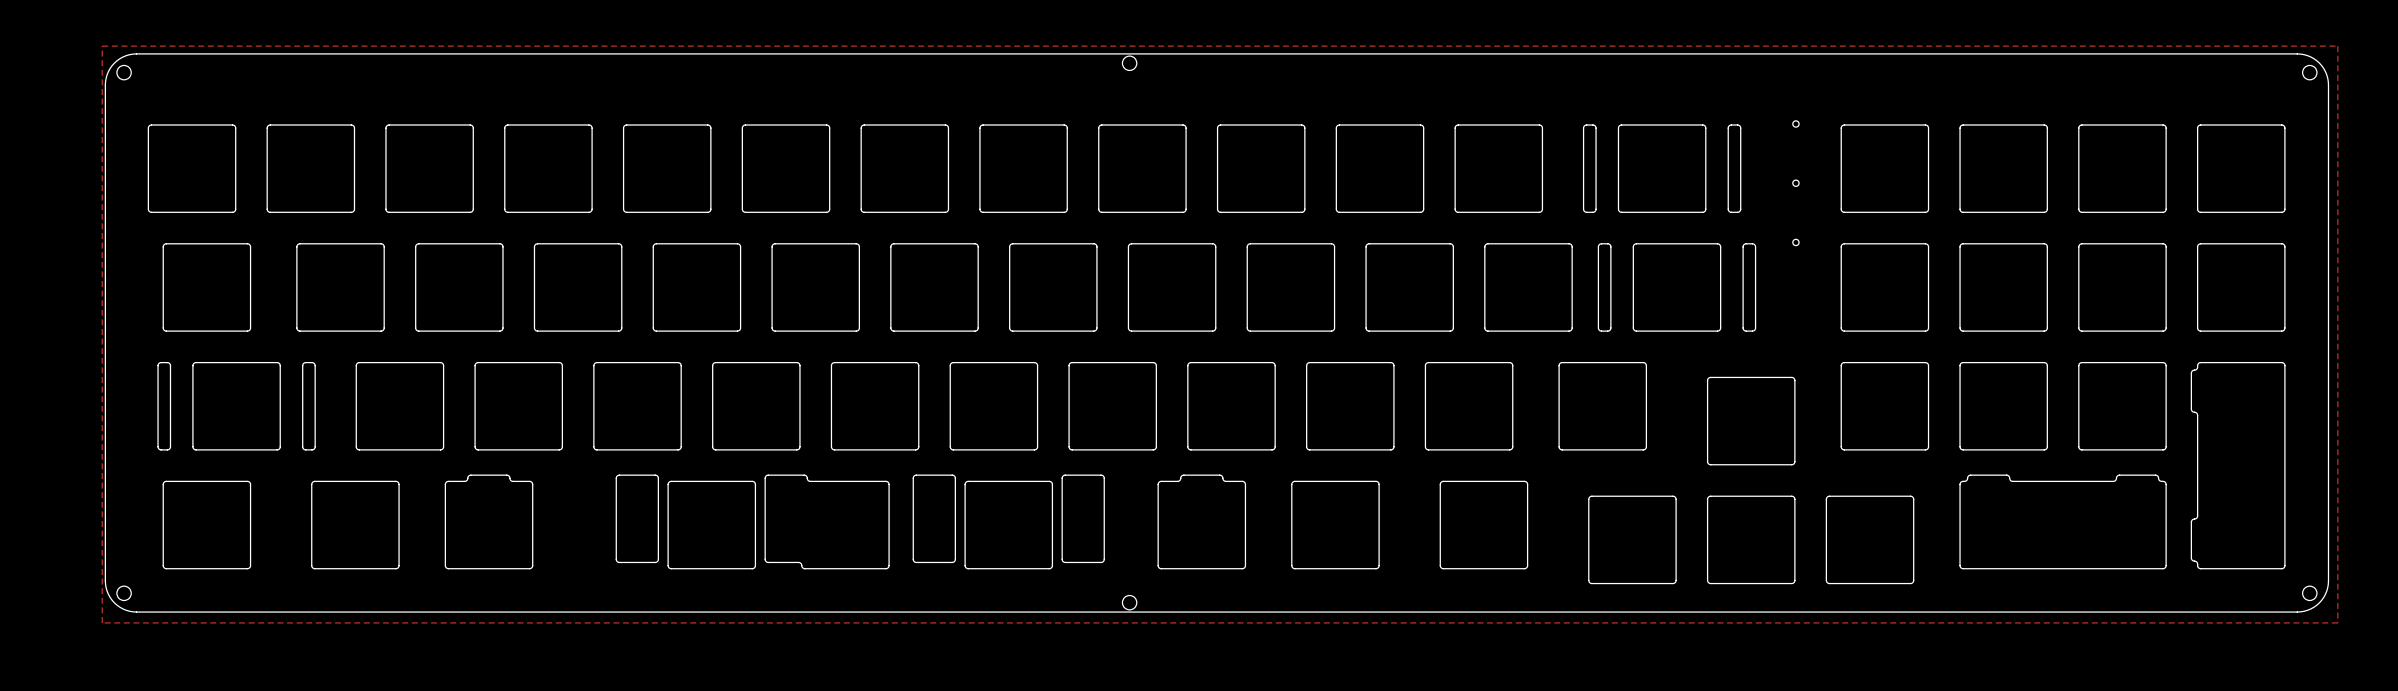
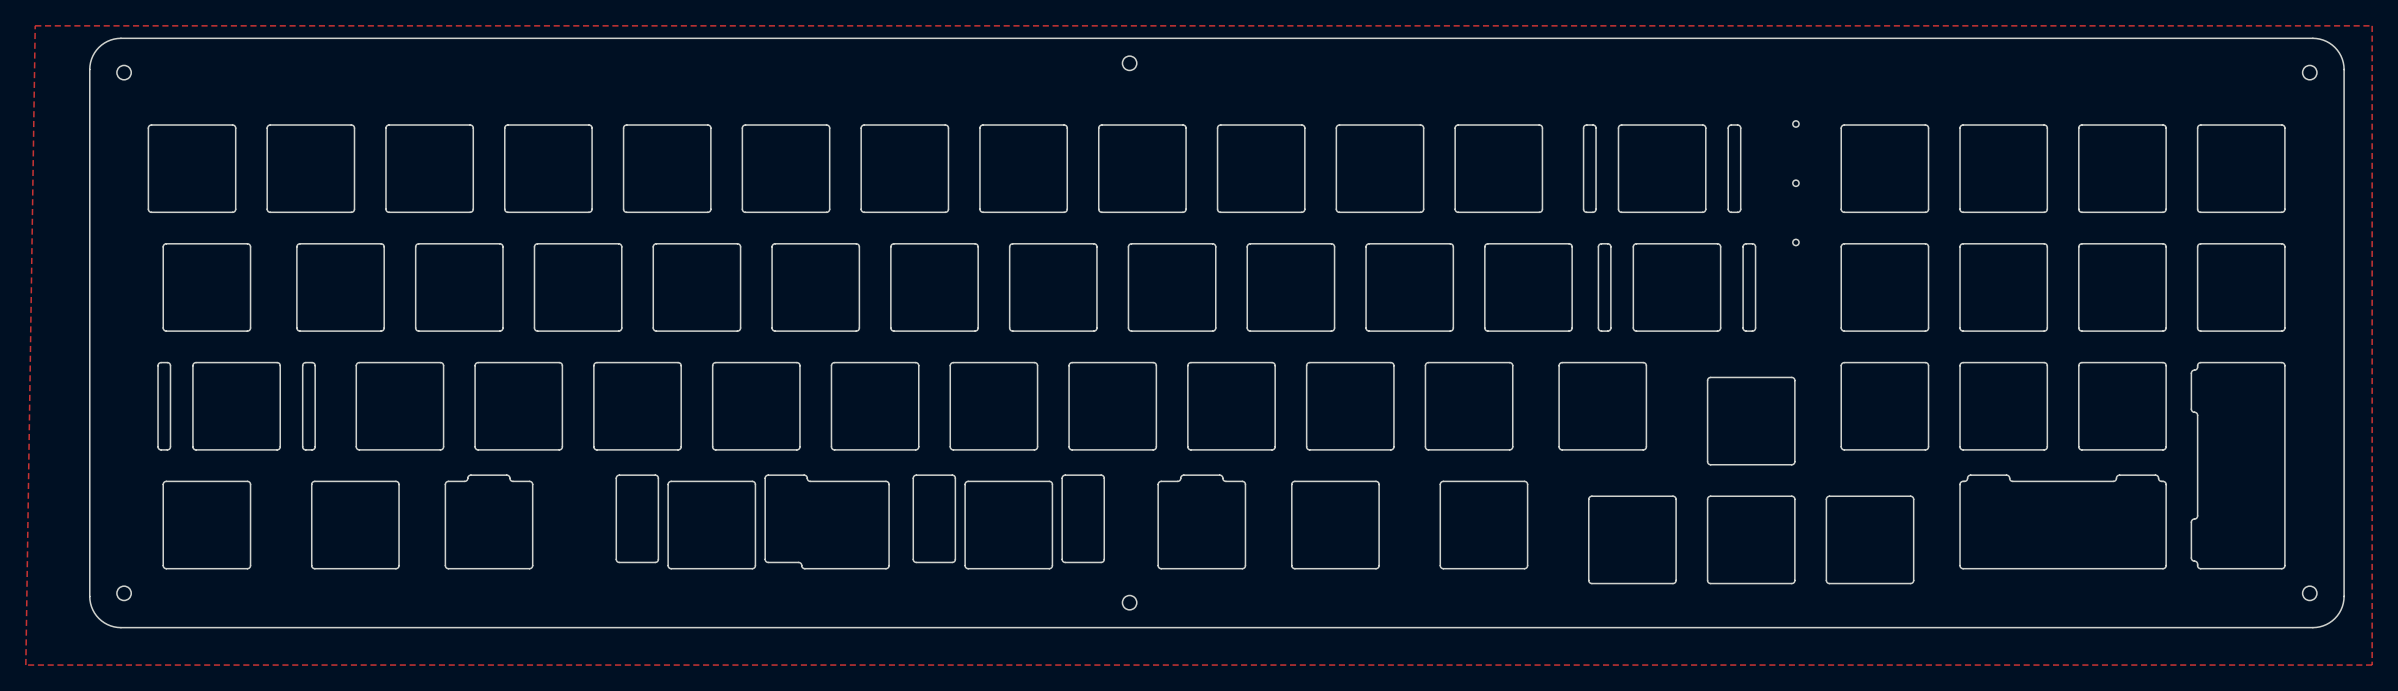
zone outline: (102, 46) (102, 622) (2337, 622) (2337, 46) (102, 46) -> (35, 25) (25, 665) (2372, 665) (2372, 25) (35, 25)
board edge: (136, 53) (2304, 54) (2313, 58) (2321, 65) (2326, 74) (2328, 85) (2327, 587) (2323, 597) (2316, 605) (2307, 610) (2297, 612) (129, 611) (119, 607) (112, 600) (107, 591) (105, 580) (105, 85) (108, 71) (114, 63) (126, 55) (136, 53) -> (120, 38) (110, 40) (98, 47) (92, 55) (89, 69) (89, 596) (91, 606) (96, 615) (104, 622) (114, 626) (2312, 627) (2323, 625) (2332, 620) (2339, 613) (2343, 603) (2344, 69) (2342, 59) (2337, 50) (2329, 43) (2319, 39) (120, 38)

